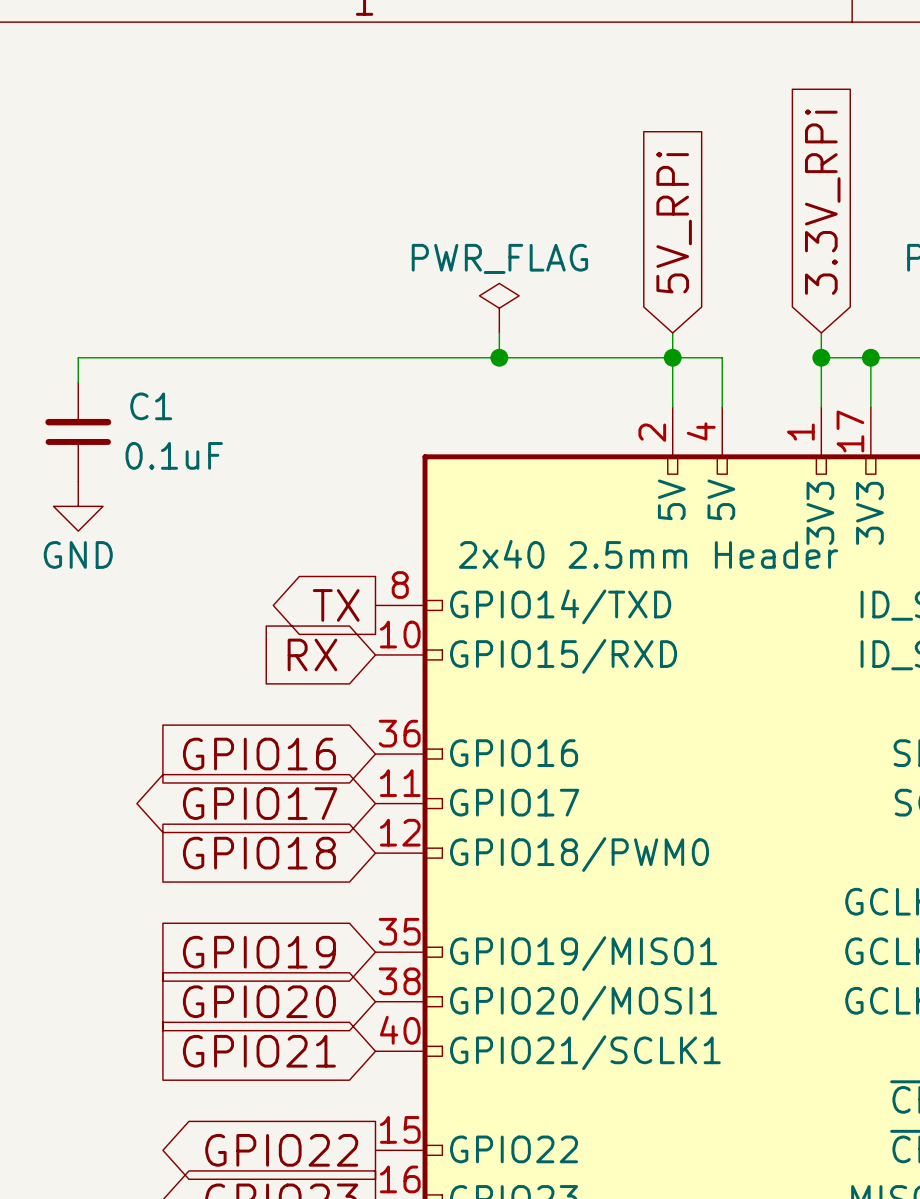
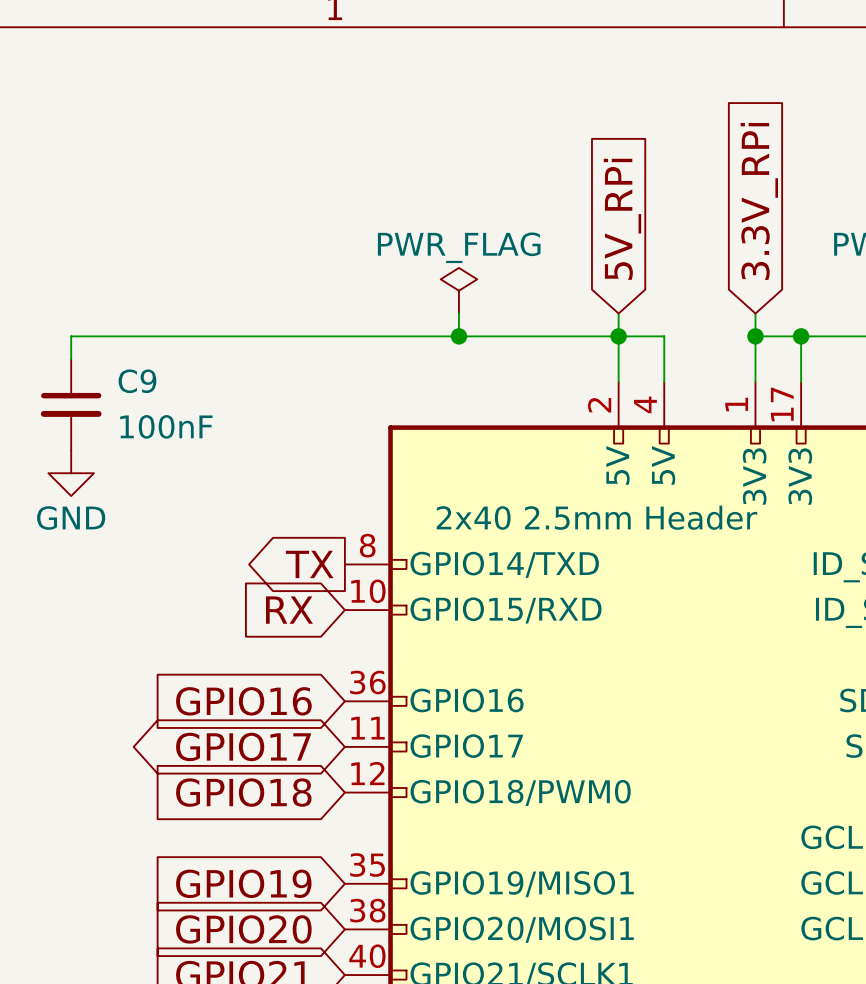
C1: 0.1uF (78, 432) -> none
C9: none -> 100nF (71, 404)

